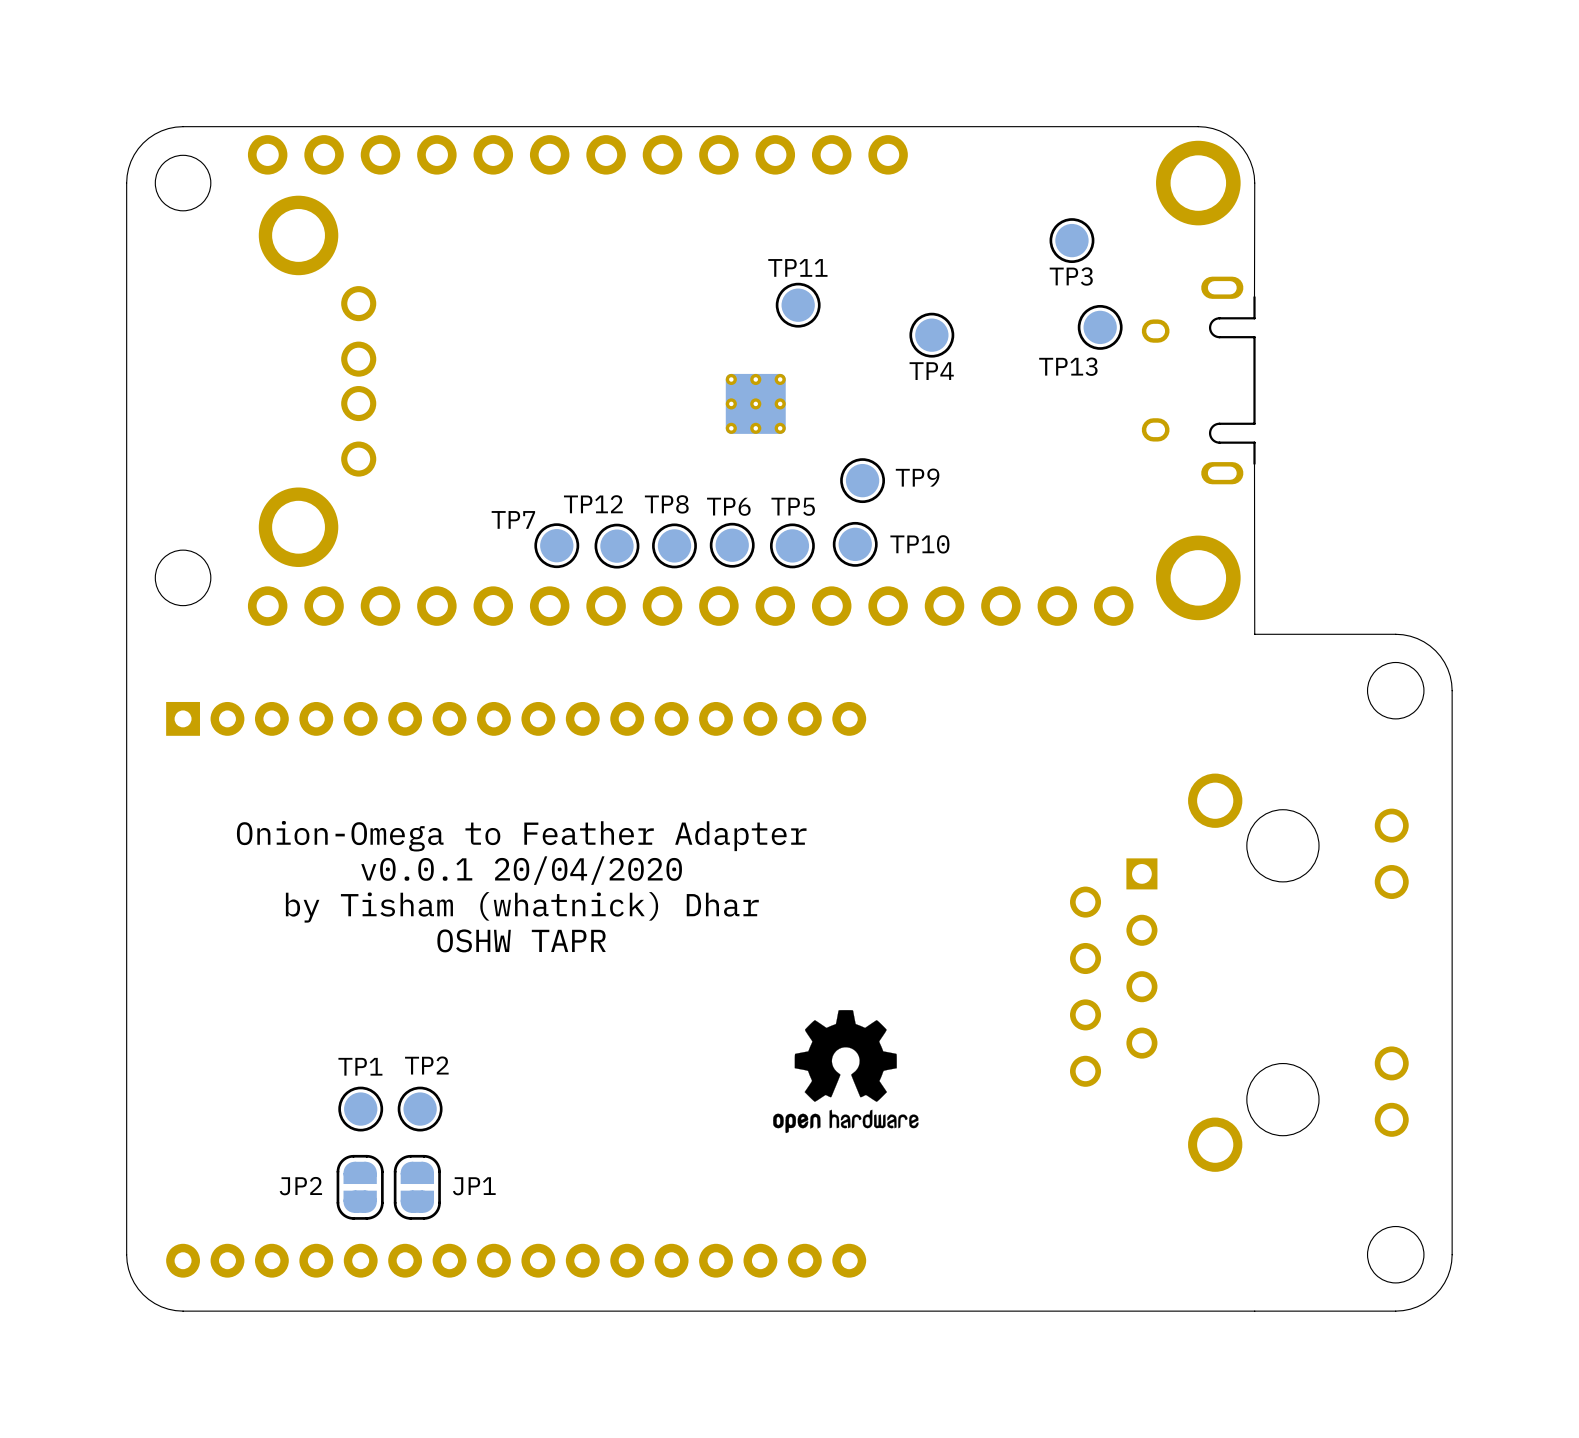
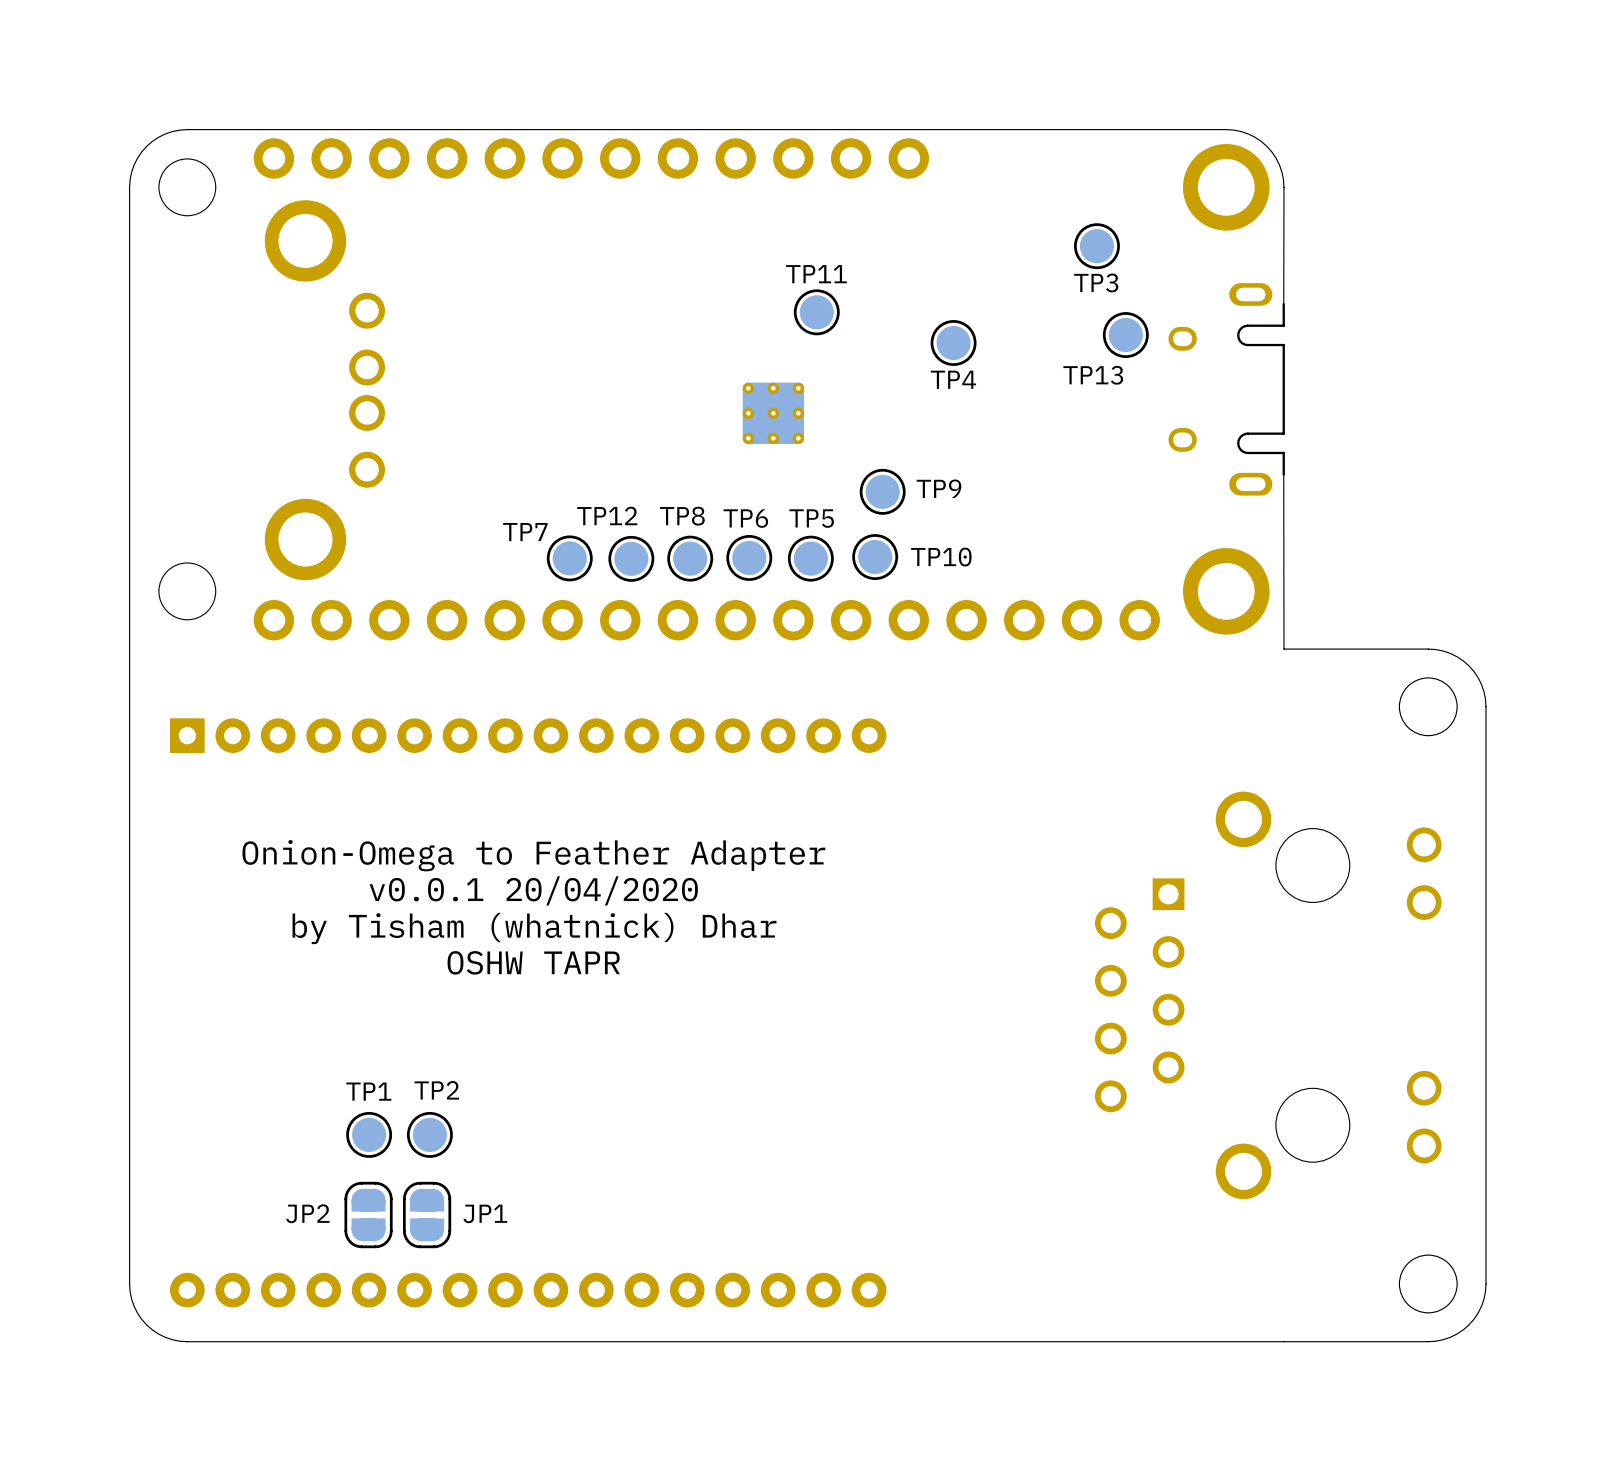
drawing: [773, 1010, 919, 1134] -> none

